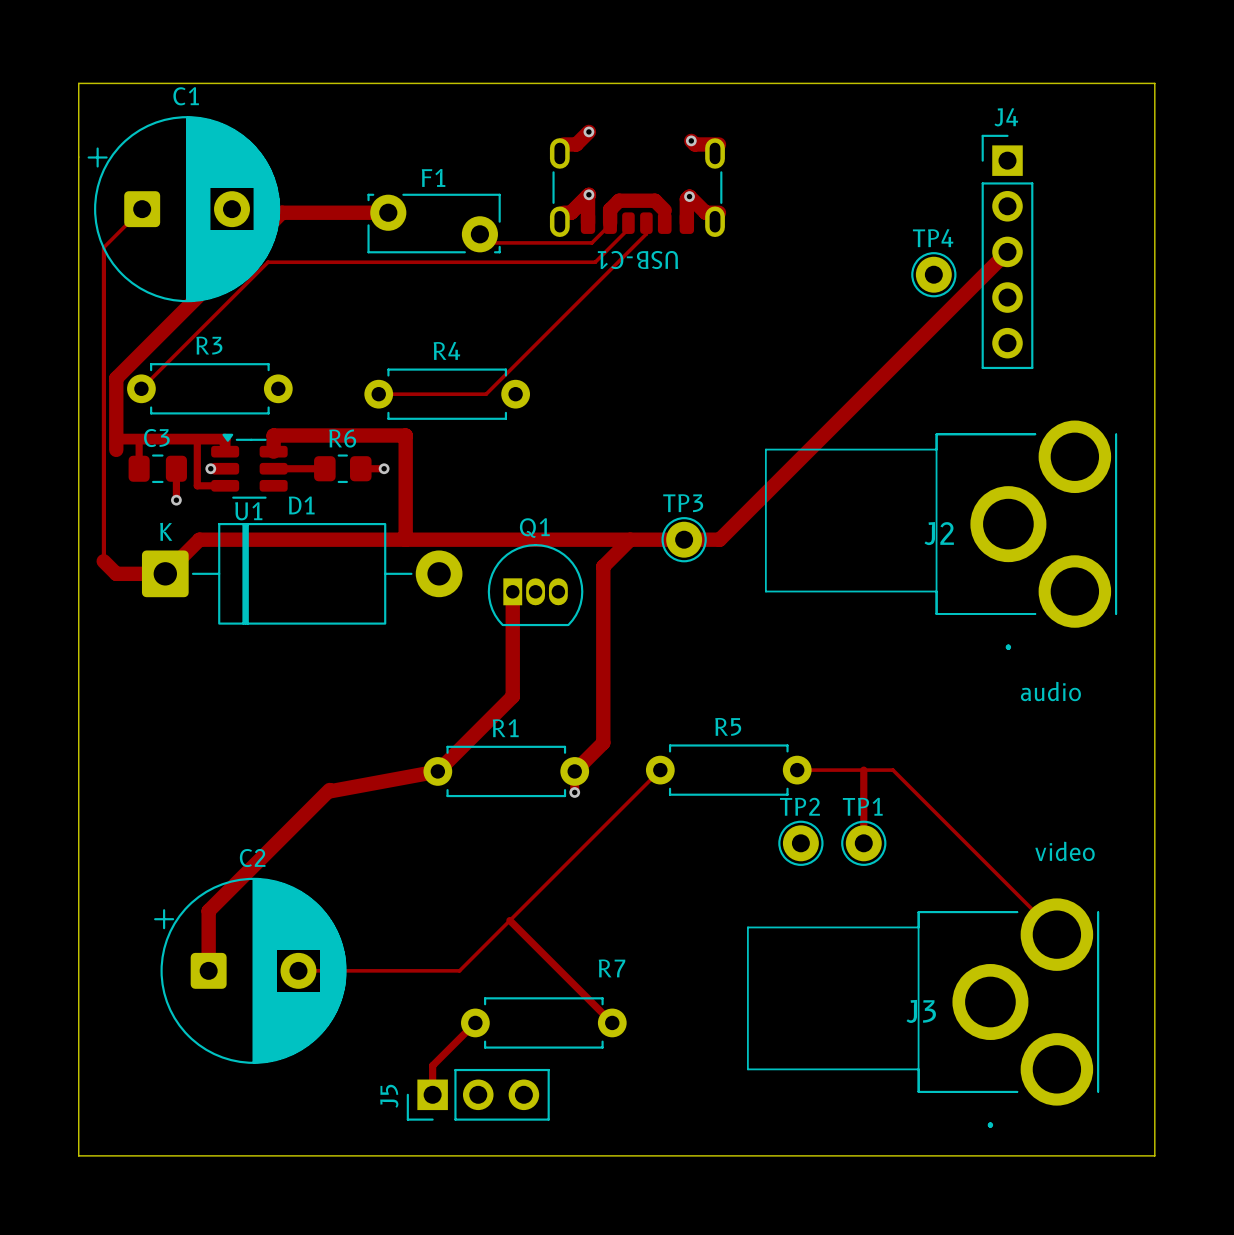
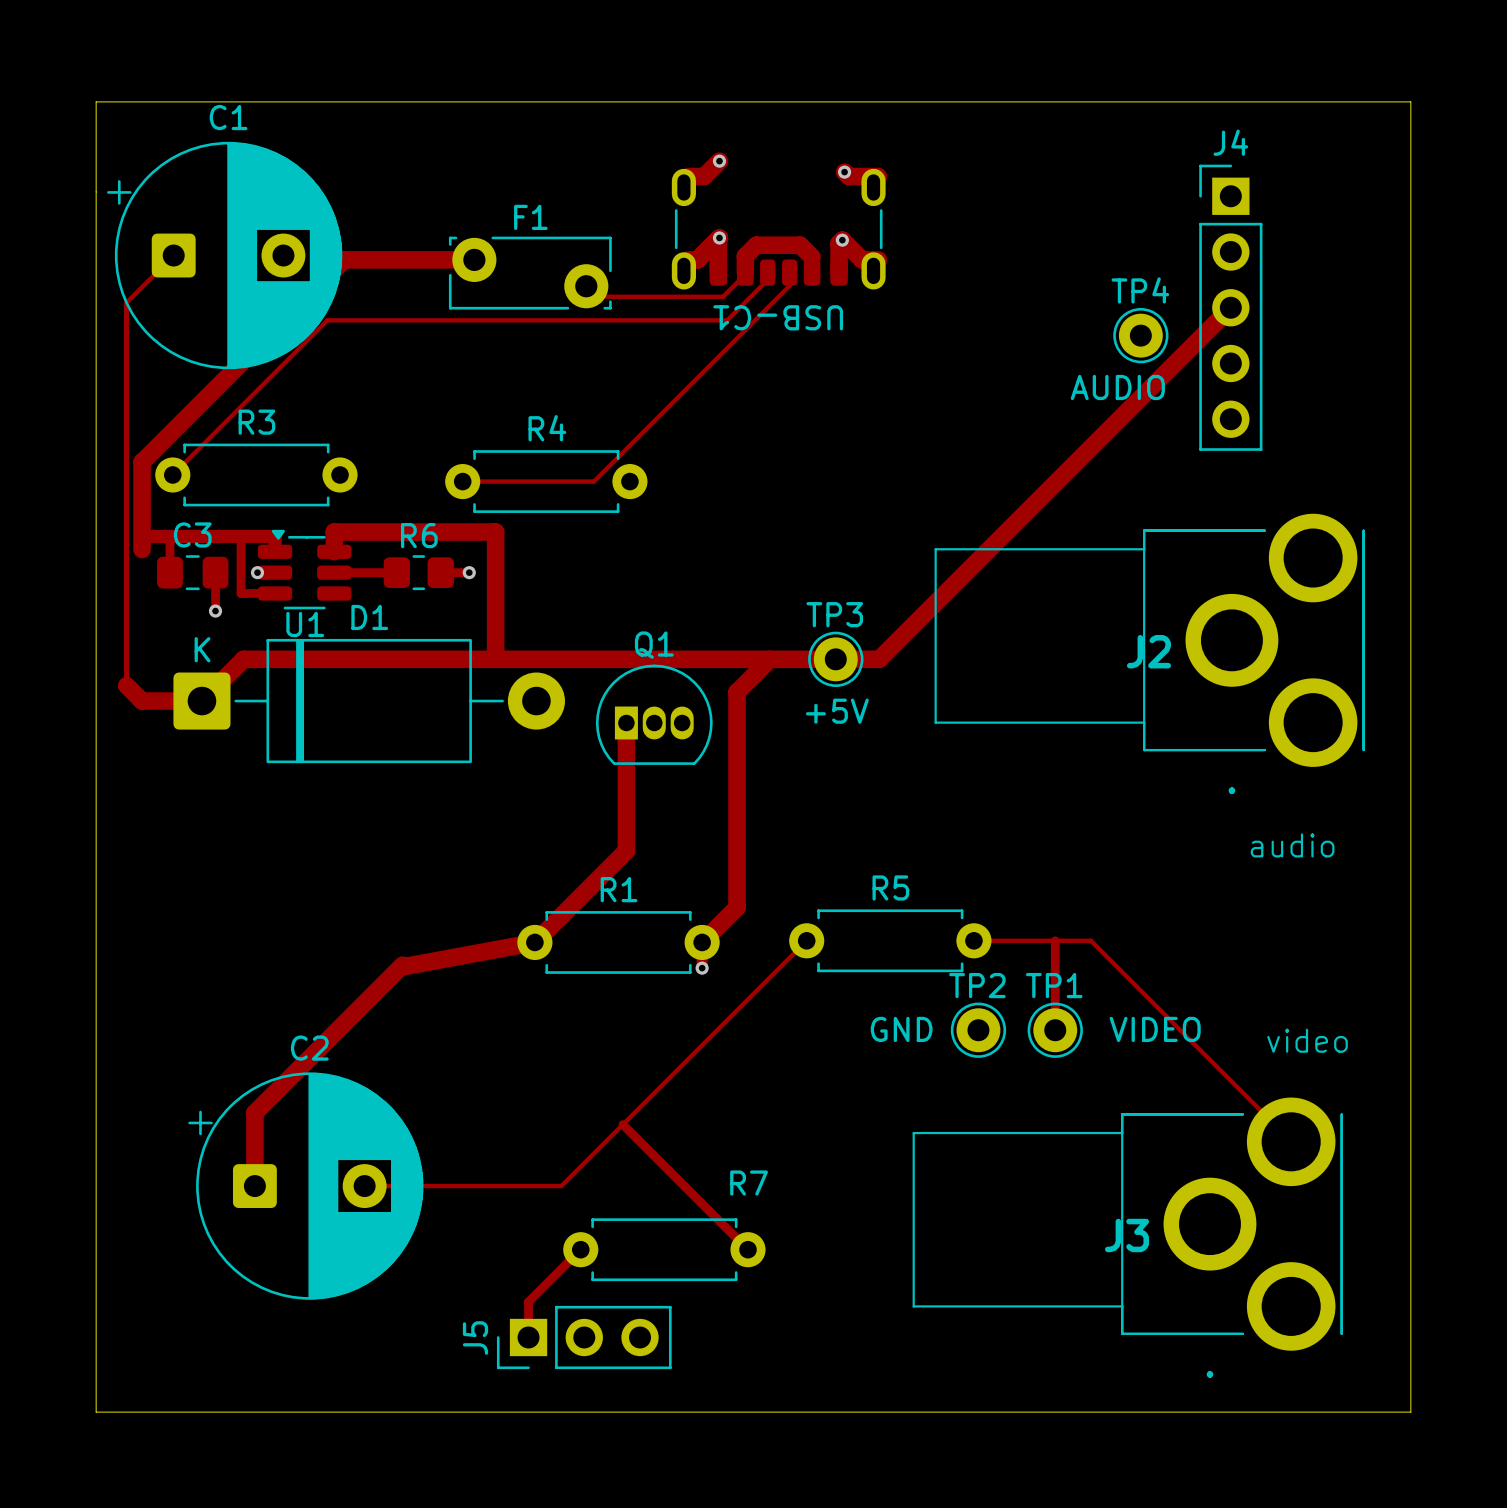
TP4 value: none -> AUDIO (1117, 387)
TP3 value: none -> +5V (837, 711)
TP2 value: none -> GND (901, 1029)
TP1 value: none -> VIDEO (1155, 1029)

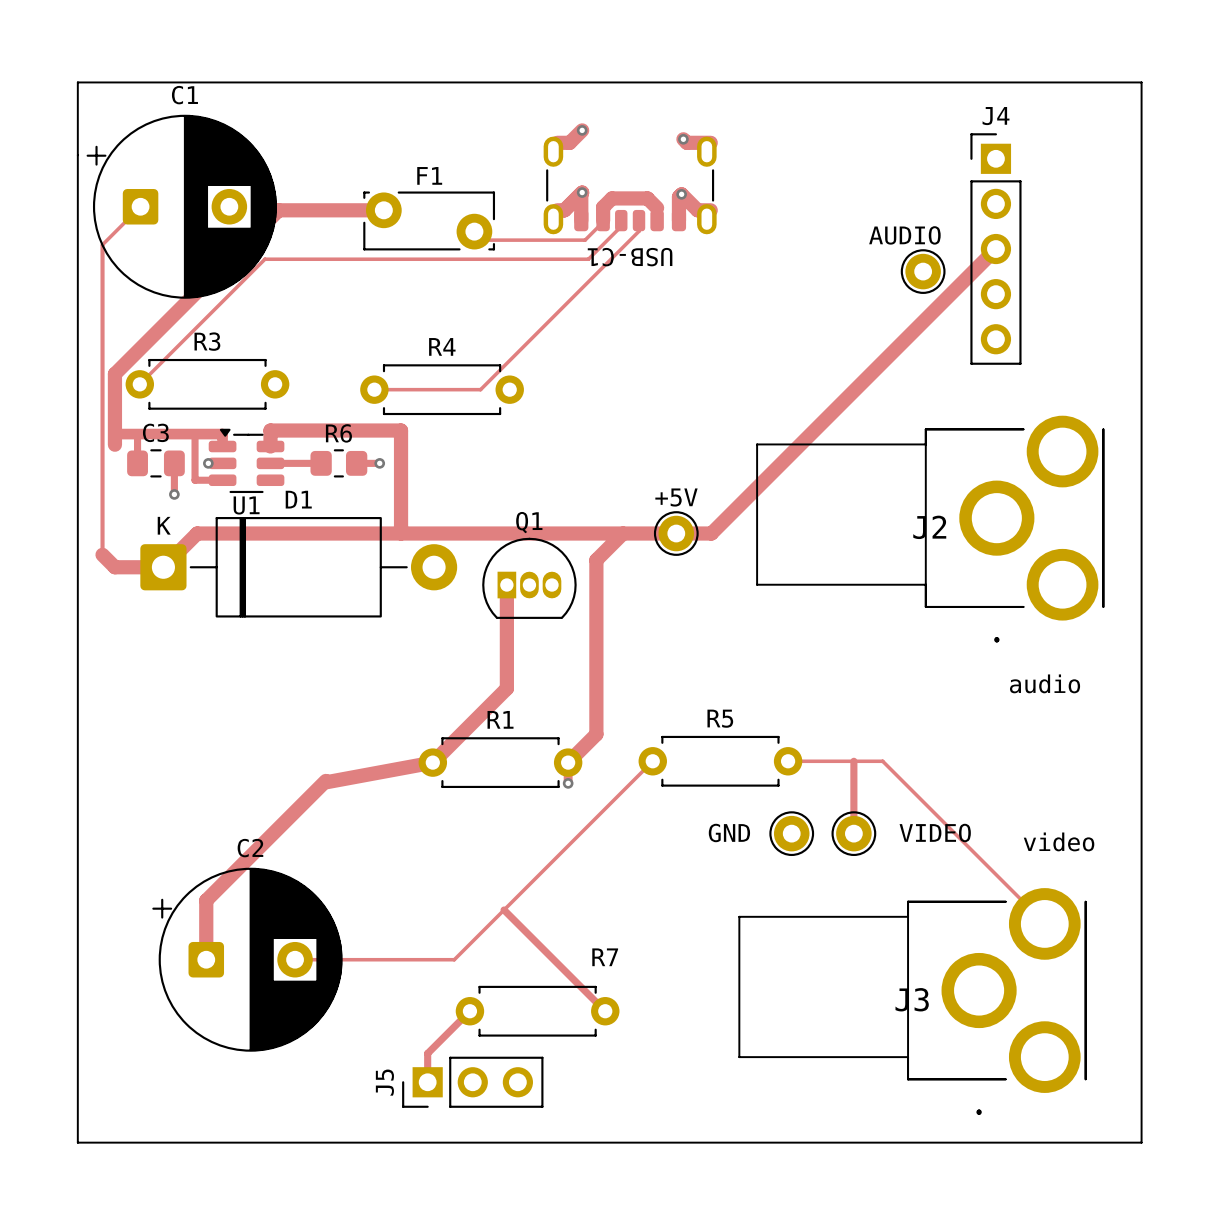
TP4 name: TP4 (1140, 290) -> none
TP4 value position: AUDIO (1117, 387) -> AUDIO (904, 235)
TP3 name: TP3 (834, 614) -> none
TP3 value position: +5V (837, 711) -> +5V (676, 497)
TP2 name: TP2 (977, 985) -> none
TP1 name: TP1 (1054, 985) -> none

